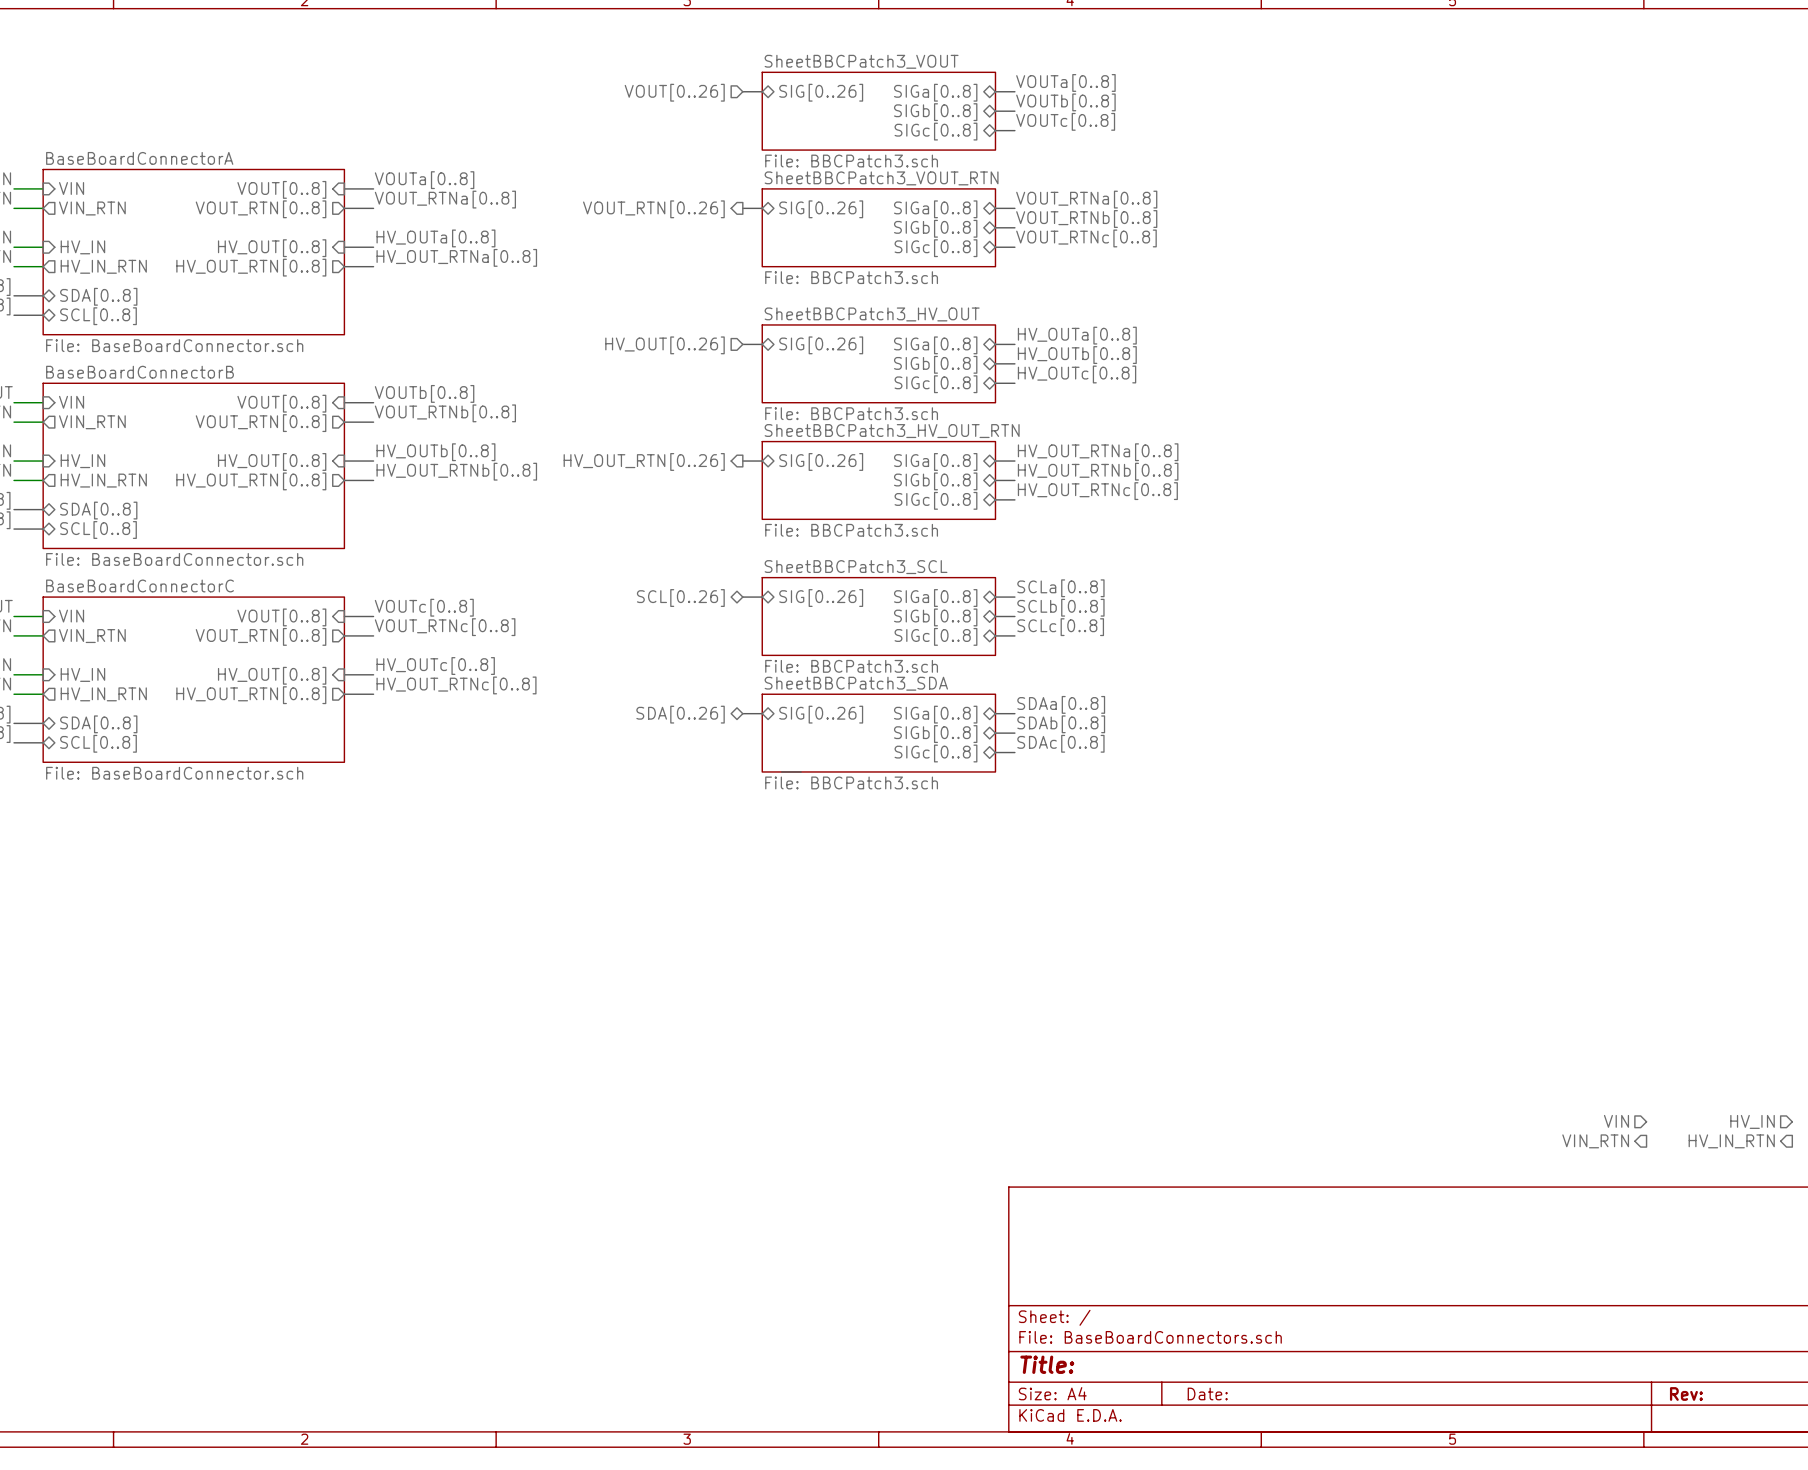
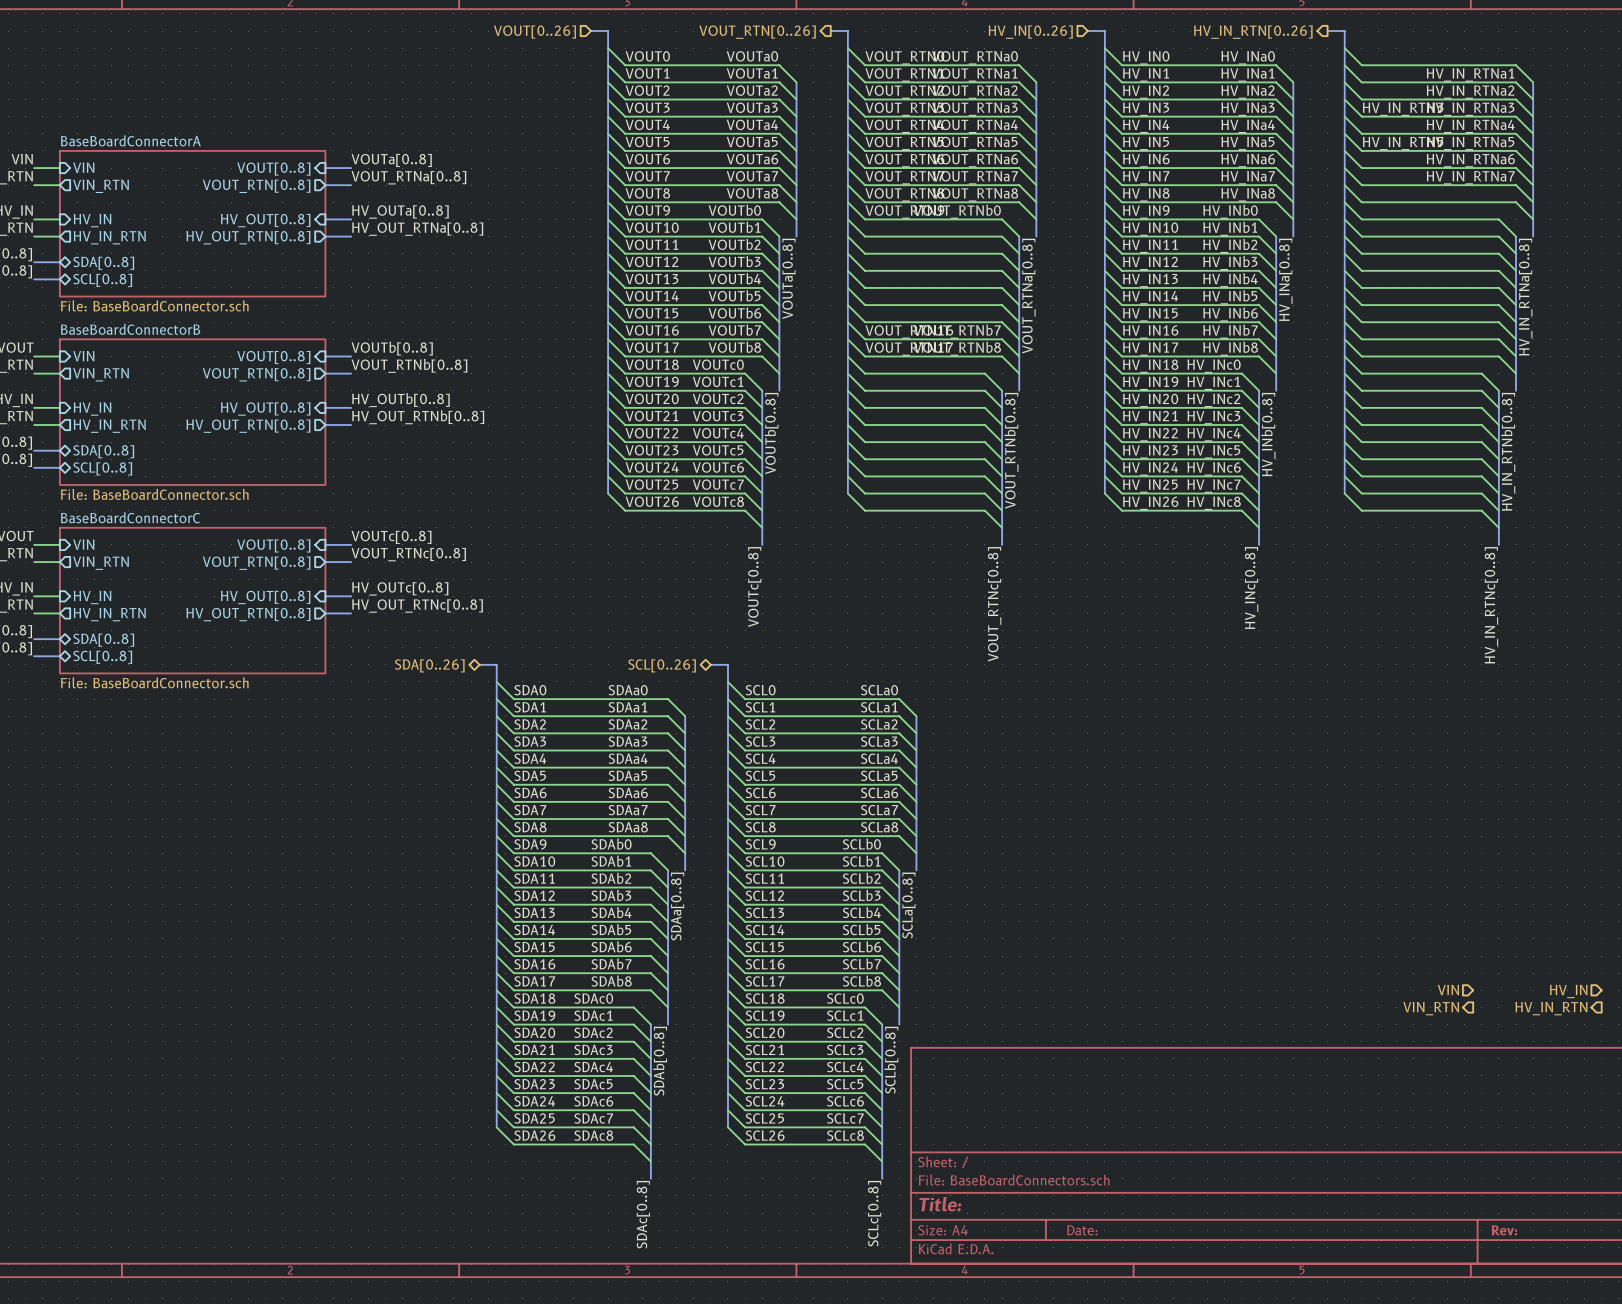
bus: none -> (590, 31) (608, 31) (608, 493)
bus: none -> (830, 31) (847, 31) (847, 493)
bus: none -> (1087, 31) (1104, 31) (1104, 493)
bus: none -> (1327, 31) (1344, 31) (1344, 493)
hierarchical label: none -> VOUT_RTN[0..26] (757, 32)
hierarchical label: none -> HV_IN[0..26] (1030, 32)
hierarchical label: none -> HV_IN_RTN[0..26] (1253, 32)
wire: none -> (608, 48) (625, 65) (779, 65) (796, 82)
wire: none -> (847, 48) (865, 65) (1019, 65) (1036, 82)
wire: none -> (1104, 48) (1122, 65) (1276, 65) (1293, 82)
wire: none -> (1344, 48) (1361, 65) (1516, 65) (1533, 82)
label: none -> VOUT0 (647, 56)
label: none -> VOUTa0 (752, 56)
label: none -> VOUT_RTN0 (904, 57)
label: none -> VOUT_RTNa0 (975, 57)
label: none -> HV_IN0 (1146, 57)
label: none -> HV_INa0 (1248, 57)
wire: none -> (608, 65) (625, 82) (779, 82) (796, 99)
wire: none -> (847, 65) (865, 82) (1019, 82) (1036, 99)
wire: none -> (1104, 65) (1122, 82) (1276, 82) (1293, 99)
wire: none -> (1344, 65) (1361, 82) (1516, 82) (1533, 99)
label: none -> VOUT1 (647, 73)
label: none -> VOUTa1 (752, 73)
label: none -> VOUT_RTN1 (904, 74)
label: VOUTa[0..8] (1065, 82) -> none
label: none -> VOUT_RTNa1 (974, 74)
label: none -> HV_IN1 (1146, 74)
label: none -> HV_INa1 (1247, 74)
label: none -> HV_IN_RTNa1 (1470, 74)
wire: none -> (608, 82) (625, 99) (779, 99) (796, 116)
bus: (742, 91) (762, 91) -> none
bus: none -> (796, 82) (796, 236)
wire: none -> (847, 82) (865, 99) (1019, 99) (1036, 116)
bus: (995, 91) (1014, 91) -> none
bus: none -> (1036, 82) (1036, 236)
wire: none -> (1104, 82) (1122, 99) (1276, 99) (1293, 116)
bus: none -> (1293, 82) (1293, 236)
wire: none -> (1344, 82) (1361, 99) (1516, 99) (1533, 116)
bus: none -> (1533, 82) (1533, 236)
hierarchical label position: VOUT[0..26] (674, 92) -> VOUT[0..26] (535, 32)
sheet pin: SIG[0..26] (821, 92) -> none
sheet pin: SIGa[0..8] (935, 92) -> none
label: none -> VOUT2 (647, 90)
label: none -> VOUTa2 (752, 90)
label: none -> VOUT_RTN2 (904, 92)
label: none -> VOUT_RTNa2 (974, 92)
label: none -> HV_IN2 (1146, 92)
label: none -> HV_INa2 (1247, 92)
label: none -> HV_IN_RTNa2 (1470, 92)
label: VOUTb[0..8] (1065, 102) -> none
wire: none -> (608, 99) (625, 116) (779, 116) (796, 133)
sheet SheetBBCPatch3_VOUT: File: BBCPatch3.sch (878, 111) -> none
wire: none -> (847, 99) (865, 116) (1019, 116) (1036, 133)
bus: (995, 111) (1014, 111) -> none
wire: none -> (1104, 99) (1122, 116) (1276, 116) (1293, 133)
wire: none -> (1344, 99) (1361, 116) (1516, 116) (1533, 133)
sheet pin: SIGb[0..8] (935, 112) -> none
label: none -> VOUT3 (647, 107)
label: none -> VOUTa3 (752, 107)
label: none -> VOUT_RTN3 (904, 109)
label: VOUTc[0..8] (1065, 121) -> none
label: none -> VOUT_RTNa3 (974, 109)
label: none -> HV_IN3 (1146, 109)
label: none -> HV_INa3 (1247, 109)
label: none -> HV_IN_RTN3 (1403, 109)
label: none -> HV_IN_RTNa3 (1470, 109)
wire: none -> (608, 116) (625, 133) (779, 133) (796, 150)
wire: none -> (847, 116) (865, 133) (1019, 133) (1036, 150)
bus: (995, 130) (1014, 130) -> none
wire: none -> (1104, 116) (1122, 133) (1276, 133) (1293, 150)
wire: none -> (1344, 116) (1361, 133) (1516, 133) (1533, 150)
sheet pin: SIGc[0..8] (935, 131) -> none
label: none -> VOUT4 (647, 124)
label: none -> VOUTa4 (752, 124)
label: none -> VOUT_RTN4 (904, 126)
label: none -> VOUT_RTNa4 (974, 126)
label: none -> HV_IN4 (1146, 126)
label: none -> HV_INa4 (1248, 126)
label: none -> HV_IN_RTNa4 (1470, 126)
wire: none -> (608, 133) (625, 150) (779, 150) (796, 168)
wire: none -> (847, 133) (865, 150) (1019, 150) (1036, 168)
wire: none -> (1104, 133) (1122, 150) (1276, 150) (1293, 168)
wire: none -> (1344, 133) (1361, 150) (1516, 150) (1533, 168)
label: none -> VOUT5 (647, 142)
label: none -> VOUTa5 (752, 142)
label: none -> VOUT_RTN5 (904, 143)
label: none -> VOUT_RTNa5 (974, 143)
label: none -> HV_IN5 (1146, 143)
label: none -> HV_INa5 (1247, 143)
label: none -> HV_IN_RTN5 (1403, 143)
label: none -> HV_IN_RTNa5 (1470, 143)
wire: none -> (608, 150) (625, 168) (779, 168) (796, 185)
wire: none -> (847, 150) (865, 168) (1019, 168) (1036, 185)
wire: none -> (1104, 150) (1122, 168) (1276, 168) (1293, 185)
wire: none -> (1344, 150) (1361, 168) (1516, 168) (1533, 185)
label: none -> VOUT6 (647, 159)
label: none -> VOUTa6 (752, 159)
label: none -> VOUT_RTN6 (904, 160)
label: none -> VOUT_RTNa6 (975, 160)
label: none -> HV_IN6 (1146, 160)
label: none -> HV_INa6 (1248, 160)
label: none -> HV_IN_RTNa6 (1470, 160)
wire: none -> (608, 168) (625, 185) (779, 185) (796, 202)
wire: none -> (847, 168) (865, 185) (1019, 185) (1036, 202)
wire: none -> (1104, 168) (1122, 185) (1276, 185) (1293, 202)
wire: none -> (1344, 168) (1361, 185) (1516, 185) (1533, 202)
label: none -> VOUT7 (647, 176)
label: none -> VOUTa7 (752, 176)
label: none -> VOUT_RTN7 (904, 177)
label: none -> VOUT_RTNa7 (974, 177)
label: none -> HV_IN7 (1146, 177)
label: none -> HV_INa7 (1248, 177)
label: none -> HV_IN_RTNa7 (1470, 177)
label rotation: 0° (1086, 199) -> 90° counterclockwise (1028, 296)
wire: none -> (608, 185) (625, 202) (779, 202) (796, 219)
bus: (742, 208) (762, 208) -> none
wire: none -> (847, 185) (865, 202) (1019, 202) (1036, 219)
bus: (995, 208) (1014, 208) -> none
wire: none -> (1104, 185) (1122, 202) (1276, 202) (1293, 219)
wire: none -> (1344, 185) (1361, 202) (1516, 202) (1533, 219)
hierarchical label: VOUT_RTN[0..26] (653, 209) -> none
sheet pin: SIG[0..26] (821, 209) -> none
sheet pin: SIGa[0..8] (935, 209) -> none
label: none -> VOUT8 (647, 193)
label: none -> VOUTa8 (752, 193)
label: none -> VOUT_RTN8 (904, 194)
label: none -> VOUT_RTNa8 (975, 194)
label: none -> HV_IN8 (1146, 194)
label: none -> HV_INa8 (1248, 194)
label: VOUT_RTNb[0..8] (1086, 219) -> none
wire: none -> (608, 202) (625, 219) (762, 219) (779, 236)
sheet SheetBBCPatch3_VOUT_RTN: File: BBCPatch3.sch (878, 227) -> none
wire: none -> (847, 202) (865, 219) (1002, 219) (1019, 236)
bus: (995, 227) (1014, 227) -> none
wire: none -> (1104, 202) (1122, 219) (1259, 219) (1276, 236)
wire: none -> (1344, 202) (1361, 219) (1498, 219) (1516, 236)
sheet pin: SIGb[0..8] (935, 228) -> none
label: none -> VOUT9 (647, 210)
label: none -> VOUTb0 (734, 210)
label: none -> VOUT_RTN9 (904, 212)
label: none -> VOUT_RTNb0 (957, 211)
label: none -> HV_IN9 (1146, 212)
label: none -> HV_INb0 (1230, 211)
label: VOUT_RTNc[0..8] (1086, 238) -> none
wire: none -> (608, 219) (625, 236) (762, 236) (779, 253)
wire: none -> (847, 219) (865, 236) (1002, 236) (1019, 253)
bus: (995, 247) (1014, 247) -> none
wire: none -> (1104, 219) (1122, 236) (1259, 236) (1276, 253)
wire: none -> (1344, 219) (1361, 236) (1498, 236) (1516, 253)
sheet pin: SIGc[0..8] (935, 248) -> none
label: none -> VOUT10 (652, 227)
label: none -> VOUTb1 (734, 227)
label: none -> HV_IN10 (1150, 229)
label: none -> HV_INb1 (1230, 228)
wire: none -> (608, 236) (625, 253) (762, 253) (779, 270)
bus: none -> (779, 236) (779, 390)
wire: none -> (847, 236) (865, 253) (1002, 253) (1019, 270)
bus: none -> (1019, 236) (1019, 390)
wire: none -> (1104, 236) (1122, 253) (1259, 253) (1276, 270)
bus: none -> (1276, 236) (1276, 390)
wire: none -> (1344, 236) (1361, 253) (1498, 253) (1516, 270)
bus: none -> (1516, 236) (1516, 390)
label: none -> VOUT11 (651, 244)
label: none -> VOUTb2 (734, 244)
label: none -> HV_IN11 (1150, 246)
label: none -> HV_INb2 (1230, 245)
wire: none -> (608, 253) (625, 270) (762, 270) (779, 287)
wire: none -> (847, 253) (865, 270) (1002, 270) (1019, 287)
wire: none -> (1104, 253) (1122, 270) (1259, 270) (1276, 287)
wire: none -> (1344, 253) (1361, 270) (1498, 270) (1516, 287)
label: none -> VOUT12 (652, 261)
label: none -> VOUTb3 (734, 261)
label: none -> HV_IN12 (1150, 263)
label: none -> HV_INb3 (1230, 263)
wire: none -> (608, 270) (625, 287) (762, 287) (779, 305)
wire: none -> (847, 270) (865, 287) (1002, 287) (1019, 305)
wire: none -> (1104, 270) (1122, 287) (1259, 287) (1276, 305)
wire: none -> (1344, 270) (1361, 287) (1498, 287) (1516, 305)
label: none -> VOUT13 (652, 279)
label: none -> VOUTb4 (734, 278)
label: none -> HV_IN13 (1150, 280)
label: none -> HV_INb4 (1230, 280)
label: none -> VOUTa[0..8] (788, 278)
label: none -> HV_INa[0..8] (1285, 279)
wire: none -> (608, 287) (625, 305) (762, 305) (779, 322)
wire: none -> (847, 287) (865, 305) (1002, 305) (1019, 322)
wire: none -> (1104, 287) (1122, 305) (1259, 305) (1276, 322)
wire: none -> (1344, 287) (1361, 305) (1498, 305) (1516, 322)
label: none -> VOUT14 (652, 296)
label: none -> VOUTb5 (734, 295)
label: none -> HV_IN14 (1150, 297)
label: none -> HV_INb5 (1230, 297)
label: HV_OUTa[0..8] (1077, 335) -> none
label: none -> HV_IN_RTNa[0..8] (1525, 297)
wire: none -> (608, 305) (625, 322) (762, 322) (779, 339)
bus: (742, 344) (762, 344) -> none
wire: none -> (847, 305) (865, 322) (1002, 322) (1019, 339)
bus: (995, 344) (1014, 344) -> none
wire: none -> (1104, 305) (1122, 322) (1259, 322) (1276, 339)
wire: none -> (1344, 305) (1361, 322) (1498, 322) (1516, 339)
hierarchical label: HV_OUT[0..26] (665, 345) -> none
sheet pin: SIG[0..26] (821, 345) -> none
sheet pin: SIGa[0..8] (935, 345) -> none
label: none -> VOUT15 (651, 313)
label: none -> VOUTb6 (734, 312)
label: none -> HV_IN15 (1150, 314)
label: none -> HV_INb6 (1230, 314)
label: HV_OUTb[0..8] (1077, 355) -> none
wire: none -> (608, 322) (625, 339) (762, 339) (779, 356)
sheet SheetBBCPatch3_HV_OUT: File: BBCPatch3.sch (878, 363) -> none
wire: none -> (847, 322) (865, 339) (1002, 339) (1019, 356)
bus: (995, 363) (1014, 363) -> none
wire: none -> (1104, 322) (1122, 339) (1259, 339) (1276, 356)
wire: none -> (1344, 322) (1361, 339) (1498, 339) (1516, 356)
sheet pin: SIGb[0..8] (935, 364) -> none
label: none -> VOUT16 (652, 330)
label: none -> VOUTb7 (734, 330)
label: none -> VOUT_RTN16 (909, 331)
label: none -> VOUT_RTNb7 (957, 331)
label: none -> HV_IN16 (1150, 331)
label: none -> HV_INb7 (1230, 331)
label: HV_OUTc[0..8] (1077, 374) -> none
wire: none -> (608, 339) (625, 356) (762, 356) (779, 373)
wire: none -> (847, 339) (865, 356) (1002, 356) (1019, 373)
bus: (995, 383) (1014, 383) -> none
wire: none -> (1104, 339) (1122, 356) (1259, 356) (1276, 373)
wire: none -> (1344, 339) (1361, 356) (1498, 356) (1516, 373)
sheet pin: SIGc[0..8] (935, 384) -> none
label: none -> VOUT17 (652, 347)
label: none -> VOUTb8 (734, 347)
label: none -> VOUT_RTN17 (909, 349)
label: none -> VOUT_RTNb8 (957, 348)
label: none -> HV_IN17 (1150, 349)
label: none -> HV_INb8 (1230, 348)
wire: none -> (608, 356) (625, 373) (745, 373) (762, 390)
wire: none -> (847, 356) (865, 373) (984, 373) (1002, 390)
wire: none -> (1104, 356) (1122, 373) (1241, 373) (1259, 390)
wire: none -> (1344, 356) (1361, 373) (1481, 373) (1498, 390)
label: none -> VOUT18 (652, 364)
label: none -> VOUTc0 (718, 364)
label: none -> HV_IN18 (1150, 366)
label: none -> HV_INc0 (1214, 366)
wire: none -> (608, 373) (625, 390) (745, 390) (762, 407)
wire: none -> (847, 373) (865, 390) (984, 390) (1002, 407)
wire: none -> (1104, 373) (1122, 390) (1241, 390) (1259, 407)
wire: none -> (1344, 373) (1361, 390) (1481, 390) (1498, 407)
label: none -> VOUT19 (652, 381)
label: none -> VOUTc1 (718, 381)
label: none -> HV_IN19 (1150, 383)
label: none -> HV_INc1 (1213, 383)
wire: none -> (608, 390) (625, 407) (745, 407) (762, 425)
bus: none -> (762, 390) (762, 544)
wire: none -> (847, 390) (865, 407) (984, 407) (1002, 425)
bus: none -> (1002, 390) (1002, 544)
wire: none -> (1104, 390) (1122, 407) (1241, 407) (1259, 425)
bus: none -> (1259, 390) (1259, 544)
wire: none -> (1344, 390) (1361, 407) (1481, 407) (1498, 425)
bus: none -> (1498, 390) (1498, 544)
label: none -> VOUT20 (652, 398)
label: none -> VOUTc2 (718, 398)
label: none -> HV_IN20 (1150, 400)
label: none -> HV_INc2 (1213, 400)
label: HV_OUT_RTNa[0..8] (1098, 452) -> none
hierarchical label: HV_OUT_RTN[0..26] (644, 461) -> none
wire: none -> (608, 407) (625, 425) (745, 425) (762, 442)
bus: (742, 461) (762, 461) -> none
sheet pin: SIG[0..26] (821, 461) -> none
sheet pin: SIGa[0..8] (935, 461) -> none
wire: none -> (847, 407) (865, 425) (984, 425) (1002, 442)
bus: (995, 461) (1014, 461) -> none
wire: none -> (1104, 407) (1122, 425) (1241, 425) (1259, 442)
wire: none -> (1344, 407) (1361, 425) (1481, 425) (1498, 442)
label: none -> VOUT21 (651, 416)
label: none -> VOUTc3 (718, 416)
label: none -> HV_IN21 (1150, 417)
label: none -> HV_INc3 (1213, 417)
label: HV_OUT_RTNb[0..8] (1098, 471) -> none
wire: none -> (608, 425) (625, 442) (745, 442) (762, 459)
sheet SheetBBCPatch3_HV_OUT_RTN: File: BBCPatch3.sch (878, 480) -> none
wire: none -> (847, 425) (865, 442) (984, 442) (1002, 459)
bus: (995, 480) (1014, 480) -> none
wire: none -> (1104, 425) (1122, 442) (1241, 442) (1259, 459)
wire: none -> (1344, 425) (1361, 442) (1481, 442) (1498, 459)
sheet pin: SIGb[0..8] (935, 481) -> none
label: none -> VOUT22 (652, 433)
label: none -> VOUTc4 (718, 433)
label: none -> HV_INc4 (1214, 434)
label: none -> HV_IN22 (1150, 434)
label: HV_OUT_RTNc[0..8] (1097, 491) -> none
label: none -> VOUTb[0..8] (771, 433)
label: none -> HV_INb[0..8] (1268, 434)
wire: none -> (608, 442) (625, 459) (745, 459) (762, 476)
wire: none -> (847, 442) (865, 459) (984, 459) (1002, 476)
bus: (995, 499) (1014, 499) -> none
wire: none -> (1104, 442) (1122, 459) (1241, 459) (1259, 476)
wire: none -> (1344, 442) (1361, 459) (1481, 459) (1498, 476)
sheet pin: SIGc[0..8] (935, 500) -> none
label: none -> VOUT23 (652, 450)
label: none -> VOUTc5 (718, 450)
label: none -> HV_IN23 (1150, 451)
label: none -> HV_INc5 (1213, 451)
label: none -> VOUT_RTNb[0..8] (1011, 450)
label: none -> HV_IN_RTNb[0..8] (1508, 451)
wire: none -> (608, 459) (625, 476) (745, 476) (762, 493)
wire: none -> (847, 459) (865, 476) (984, 476) (1002, 493)
wire: none -> (1104, 459) (1122, 476) (1241, 476) (1259, 493)
wire: none -> (1344, 459) (1361, 476) (1481, 476) (1498, 493)
label: none -> VOUT24 (652, 467)
label: none -> VOUTc6 (718, 467)
label: none -> HV_IN24 (1150, 468)
label: none -> HV_INc6 (1214, 468)
wire: none -> (608, 476) (625, 493) (745, 493) (762, 510)
wire: none -> (847, 476) (865, 493) (984, 493) (1002, 510)
wire: none -> (1104, 476) (1122, 493) (1241, 493) (1259, 510)
wire: none -> (1344, 476) (1361, 493) (1481, 493) (1498, 510)
label: none -> VOUT25 (651, 484)
label: none -> VOUTc7 (718, 484)
label: none -> HV_IN25 (1150, 486)
label: none -> HV_INc7 (1214, 486)
wire: none -> (608, 493) (625, 510) (745, 510) (762, 527)
wire: none -> (847, 493) (865, 510) (984, 510) (1002, 527)
wire: none -> (1104, 493) (1122, 510) (1241, 510) (1259, 527)
wire: none -> (1344, 493) (1361, 510) (1481, 510) (1498, 527)
label: none -> VOUT26 (652, 501)
label: none -> VOUTc8 (718, 501)
label: none -> HV_IN26 (1150, 503)
label: none -> HV_INc8 (1214, 503)
label: SCLa[0..8] (1060, 588) -> none
bus: (742, 597) (762, 597) -> none
bus: (995, 597) (1014, 597) -> none
hierarchical label position: SCL[0..26] (680, 598) -> SCL[0..26] (662, 665)
sheet pin: SIG[0..26] (821, 598) -> none
sheet pin: SIGa[0..8] (935, 598) -> none
label: SCLb[0..8] (1060, 607) -> none
sheet SheetBBCPatch3_SCL: File: BBCPatch3.sch (878, 616) -> none
bus: (995, 616) (1014, 616) -> none
sheet pin: SIGb[0..8] (935, 617) -> none
label: SCLc[0..8] (1060, 627) -> none
bus: (995, 635) (1014, 635) -> none
sheet pin: SIGc[0..8] (935, 636) -> none
label: none -> VOUTc[0..8] (754, 586)
label: none -> HV_INc[0..8] (1251, 588)
label: none -> VOUT_RTNc[0..8] (994, 604)
label: none -> HV_IN_RTNc[0..8] (1491, 605)
label: SDAa[0..8] (1061, 704) -> none
bus: (742, 713) (762, 713) -> none
bus: (995, 713) (1014, 713) -> none
hierarchical label: SDA[0..26] (680, 714) -> none
sheet pin: SIG[0..26] (821, 714) -> none
sheet pin: SIGa[0..8] (935, 714) -> none
label: SDAb[0..8] (1061, 724) -> none
sheet SheetBBCPatch3_SDA: File: BBCPatch3.sch (878, 733) -> none
bus: (995, 733) (1014, 733) -> none
sheet pin: SIGb[0..8] (935, 734) -> none
label: SDAc[0..8] (1060, 743) -> none
bus: none -> (479, 664) (496, 664) (496, 1127)
bus: none -> (710, 664) (727, 664) (727, 1127)
bus: (995, 752) (1014, 752) -> none
hierarchical label: none -> SDA[0..26] (429, 665)
sheet pin: SIGc[0..8] (935, 753) -> none
wire: none -> (496, 681) (513, 699) (668, 699) (685, 716)
bus: (781, 771) (801, 771) -> none
wire: none -> (727, 681) (745, 699) (899, 699) (916, 716)
label: none -> SDA0 (530, 690)
label: none -> SDAa0 (628, 690)
label: none -> SCL0 (760, 690)
label: none -> SCLa0 (879, 690)
wire: none -> (496, 699) (513, 716) (668, 716) (685, 733)
wire: none -> (727, 699) (745, 716) (899, 716) (916, 733)
label: none -> SDA1 (530, 707)
label: none -> SDAa1 (627, 707)
label: none -> SCL1 (760, 707)
label: none -> SCLa1 (879, 707)
wire: none -> (496, 716) (513, 733) (668, 733) (685, 750)
bus: none -> (685, 716) (685, 870)
wire: none -> (727, 716) (745, 733) (899, 733) (916, 750)
bus: none -> (916, 716) (916, 870)
label: none -> SDA2 (530, 724)
label: none -> SDAa2 (627, 724)
label: none -> SCL2 (760, 724)
label: none -> SCLa2 (879, 724)
wire: none -> (496, 733) (513, 750) (668, 750) (685, 767)
wire: none -> (727, 733) (745, 750) (899, 750) (916, 767)
label: none -> SDA3 (530, 741)
label: none -> SDAa3 (627, 741)
label: none -> SCL3 (760, 741)
label: none -> SCLa3 (879, 741)
wire: none -> (496, 750) (513, 767) (668, 767) (685, 784)
wire: none -> (727, 750) (745, 767) (899, 767) (916, 784)
label: none -> SDA4 (530, 758)
label: none -> SDAa4 (628, 758)
label: none -> SCL4 (760, 758)
label: none -> SCLa4 (879, 758)
wire: none -> (496, 767) (513, 784) (668, 784) (685, 801)
wire: none -> (727, 767) (745, 784) (899, 784) (916, 801)
label: none -> SDA5 (530, 775)
label: none -> SDAa5 (627, 775)
label: none -> SCL5 (760, 775)
label: none -> SCLa5 (879, 775)
wire: none -> (496, 784) (513, 801) (668, 801) (685, 819)
wire: none -> (727, 784) (745, 801) (899, 801) (916, 819)
label: none -> SDA6 (530, 792)
label: none -> SDAa6 (628, 792)
label: none -> SCL6 (760, 792)
label: none -> SCLa6 (879, 792)
wire: none -> (496, 801) (513, 819) (668, 819) (685, 836)
wire: none -> (727, 801) (745, 819) (899, 819) (916, 836)
label: none -> SDA7 (530, 810)
label: none -> SDAa7 (628, 810)
label: none -> SCL7 (760, 810)
label: none -> SCLa7 (879, 810)
wire: none -> (496, 819) (513, 836) (668, 836) (685, 853)
wire: none -> (727, 819) (745, 836) (899, 836) (916, 853)
label: none -> SDA8 (530, 827)
label: none -> SDAa8 (628, 827)
label: none -> SCL8 (760, 827)
label: none -> SCLa8 (879, 827)
wire: none -> (496, 836) (513, 853) (650, 853) (668, 870)
wire: none -> (727, 836) (745, 853) (882, 853) (899, 870)
label: none -> SDA9 (530, 844)
label: none -> SDAb0 (611, 844)
label: none -> SCL9 (760, 844)
label: none -> SCLb0 (861, 844)
wire: none -> (496, 853) (513, 870) (650, 870) (668, 887)
wire: none -> (727, 853) (745, 870) (882, 870) (899, 887)
label: none -> SDA10 (534, 861)
label: none -> SDAb1 (611, 861)
label: none -> SCL10 (765, 861)
label: none -> SCLb1 (861, 861)
wire: none -> (496, 870) (513, 887) (650, 887) (668, 904)
bus: none -> (668, 870) (668, 1024)
wire: none -> (727, 870) (745, 887) (882, 887) (899, 904)
bus: none -> (899, 870) (899, 1024)
label: none -> SDA11 (534, 878)
label: none -> SDAb2 (611, 878)
label: none -> SCL11 (764, 878)
label: none -> SCLb2 (861, 878)
wire: none -> (496, 887) (513, 904) (650, 904) (668, 921)
wire: none -> (727, 887) (745, 904) (882, 904) (899, 921)
label: none -> SDA12 (534, 895)
label: none -> SDAb3 (611, 895)
label: none -> SCL12 (764, 895)
label: none -> SCLb3 (861, 895)
wire: none -> (496, 904) (513, 921) (650, 921) (668, 938)
wire: none -> (727, 904) (745, 921) (882, 921) (899, 938)
label: none -> SCLa[0..8] (908, 905)
label: none -> SDA13 (534, 912)
label: none -> SDAb4 (611, 912)
label: none -> SDAa[0..8] (677, 906)
label: none -> SCL13 (764, 912)
label: none -> SCLb4 (861, 912)
wire: none -> (496, 921) (513, 938) (650, 938) (668, 956)
wire: none -> (727, 921) (745, 938) (882, 938) (899, 956)
label: none -> SDA14 (534, 930)
label: none -> SDAb5 (611, 929)
label: none -> SCL14 (765, 930)
label: none -> SCLb5 (861, 929)
wire: none -> (496, 938) (513, 956) (650, 956) (668, 973)
wire: none -> (727, 938) (745, 956) (882, 956) (899, 973)
label: none -> SDA15 (534, 947)
label: none -> SDAb6 (611, 946)
label: none -> SCL15 (764, 947)
label: none -> SCLb6 (861, 946)
wire: none -> (496, 956) (513, 973) (650, 973) (668, 990)
wire: none -> (727, 956) (745, 973) (882, 973) (899, 990)
label: none -> SDA16 (534, 964)
label: none -> SDAb7 (611, 963)
label: none -> SCL16 (765, 964)
label: none -> SCLb7 (861, 963)
wire: none -> (496, 973) (513, 990) (650, 990) (668, 1007)
wire: none -> (727, 973) (745, 990) (882, 990) (899, 1007)
label: none -> SDA17 (534, 981)
label: none -> SDAb8 (611, 981)
label: none -> SCL17 (765, 981)
label: none -> SCLb8 (861, 981)
wire: none -> (496, 990) (513, 1007) (633, 1007) (650, 1024)
wire: none -> (727, 990) (745, 1007) (865, 1007) (882, 1024)
label: none -> SDA18 (534, 998)
label: none -> SDAc0 (593, 998)
label: none -> SCL18 (765, 998)
label: none -> SCLc0 (845, 998)
wire: none -> (496, 1007) (513, 1024) (633, 1024) (650, 1041)
wire: none -> (727, 1007) (745, 1024) (865, 1024) (882, 1041)
label: none -> SDA19 (534, 1015)
label: none -> SDAc1 (593, 1015)
label: none -> SCL19 (765, 1015)
label: none -> SCLc1 (845, 1015)
wire: none -> (496, 1024) (513, 1041) (633, 1041) (650, 1058)
bus: none -> (650, 1024) (650, 1178)
wire: none -> (727, 1024) (745, 1041) (865, 1041) (882, 1058)
bus: none -> (882, 1024) (882, 1178)
label: none -> SDA20 (534, 1032)
label: none -> SDAc2 (593, 1032)
label: none -> SCL20 (765, 1032)
label: none -> SCLc2 (845, 1032)
wire: none -> (496, 1041) (513, 1058) (633, 1058) (650, 1075)
wire: none -> (727, 1041) (745, 1058) (865, 1058) (882, 1075)
label: none -> SDA21 (534, 1049)
label: none -> SDAc3 (593, 1049)
label: none -> SCL21 (764, 1049)
label: none -> SCLc3 (845, 1049)
wire: none -> (496, 1058) (513, 1075) (633, 1075) (650, 1093)
wire: none -> (727, 1058) (745, 1075) (865, 1075) (882, 1093)
label: none -> SCLb[0..8] (891, 1060)
label: none -> SDA22 (534, 1067)
label: none -> SDAc4 (593, 1067)
label: none -> SDAb[0..8] (660, 1061)
label: none -> SCL22 (764, 1067)
label: none -> SCLc4 (845, 1067)
wire: none -> (496, 1075) (513, 1093) (633, 1093) (650, 1110)
wire: none -> (727, 1075) (745, 1093) (865, 1093) (882, 1110)
label: none -> SDA23 (534, 1084)
label: none -> SDAc5 (593, 1084)
label: none -> SCL23 (764, 1084)
label: none -> SCLc5 (845, 1084)
wire: none -> (496, 1093) (513, 1110) (633, 1110) (650, 1127)
wire: none -> (727, 1093) (745, 1110) (865, 1110) (882, 1127)
label: none -> SDA24 (534, 1101)
label: none -> SDAc6 (593, 1101)
label: none -> SCL24 (765, 1101)
label: none -> SCLc6 (845, 1101)
wire: none -> (496, 1110) (513, 1127) (633, 1127) (650, 1144)
wire: none -> (727, 1110) (745, 1127) (865, 1127) (882, 1144)
label: none -> SDA25 (534, 1118)
label: none -> SDAc7 (593, 1118)
label: none -> SCL25 (764, 1118)
label: none -> SCLc7 (845, 1118)
wire: none -> (496, 1127) (513, 1144) (633, 1144) (650, 1161)
wire: none -> (727, 1127) (745, 1144) (865, 1144) (882, 1161)
label: none -> SDA26 (534, 1135)
label: none -> SDAc8 (593, 1135)
label: none -> SCL26 (765, 1135)
label: none -> SCLc8 (845, 1135)
label: none -> SDAc[0..8] (643, 1214)
label: none -> SCLc[0..8] (874, 1213)

